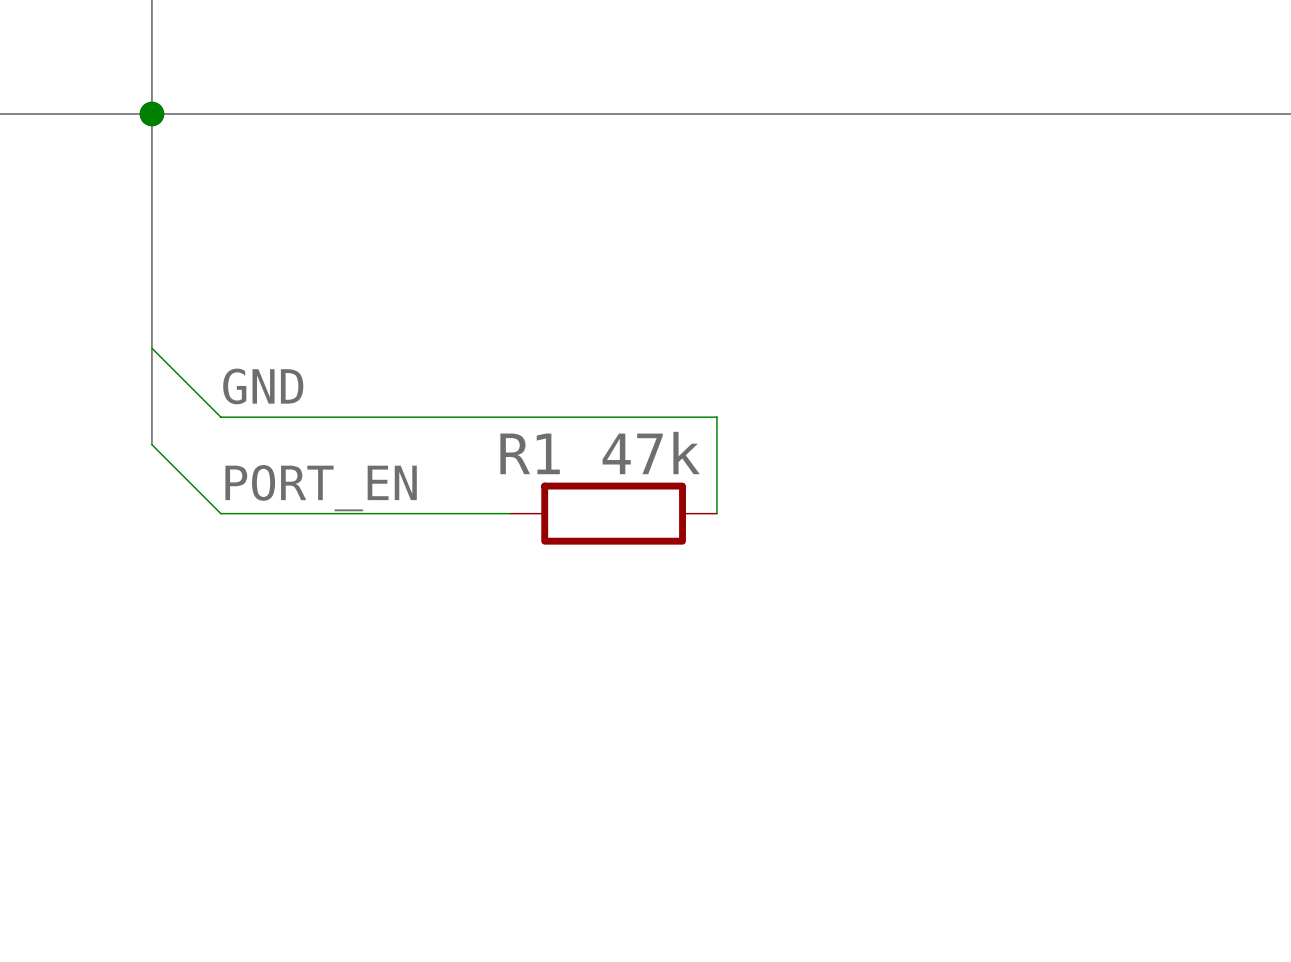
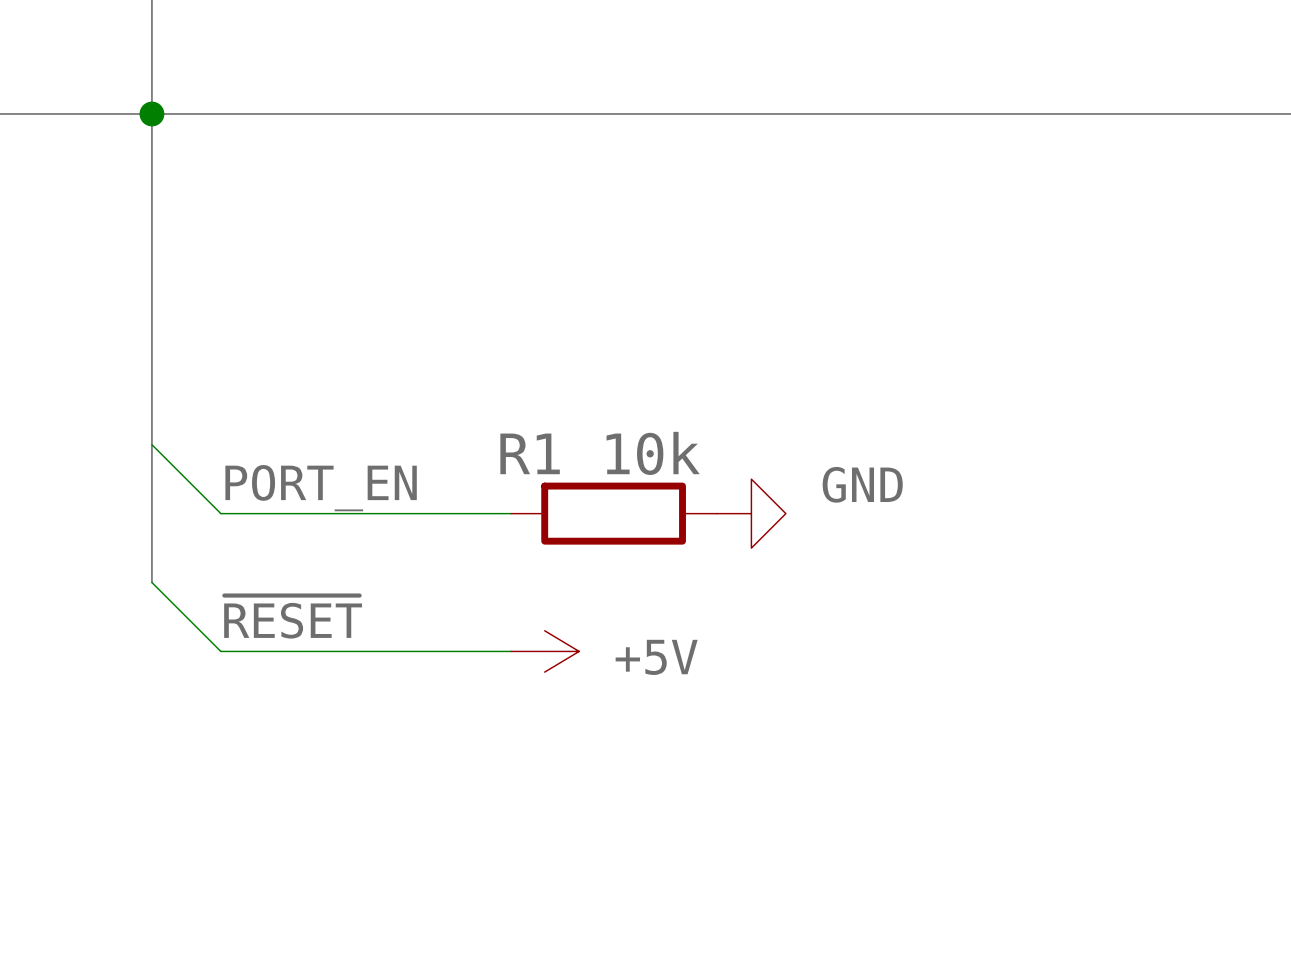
wire: (151, 348) (220, 417) (716, 417) (716, 513) -> none
label: GND (263, 386) -> none
bus: none -> (151, 444) (151, 582)
R1 value: 47k (651, 453) -> 10k (653, 453)
power symbol: none -> GND (751, 513)
wire: none -> (151, 582) (220, 651) (510, 651)
label: none -> ~{RESET} (293, 617)
power symbol: none -> +5V (544, 651)

